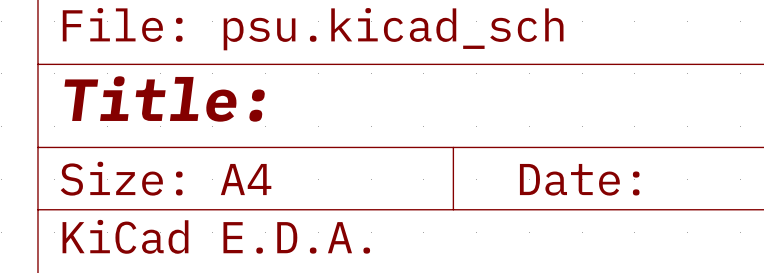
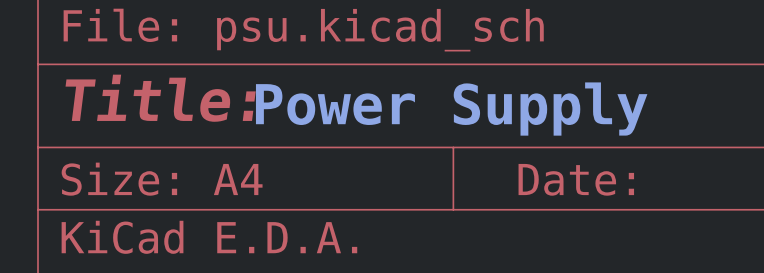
text: none -> Power Supply (451, 109)

